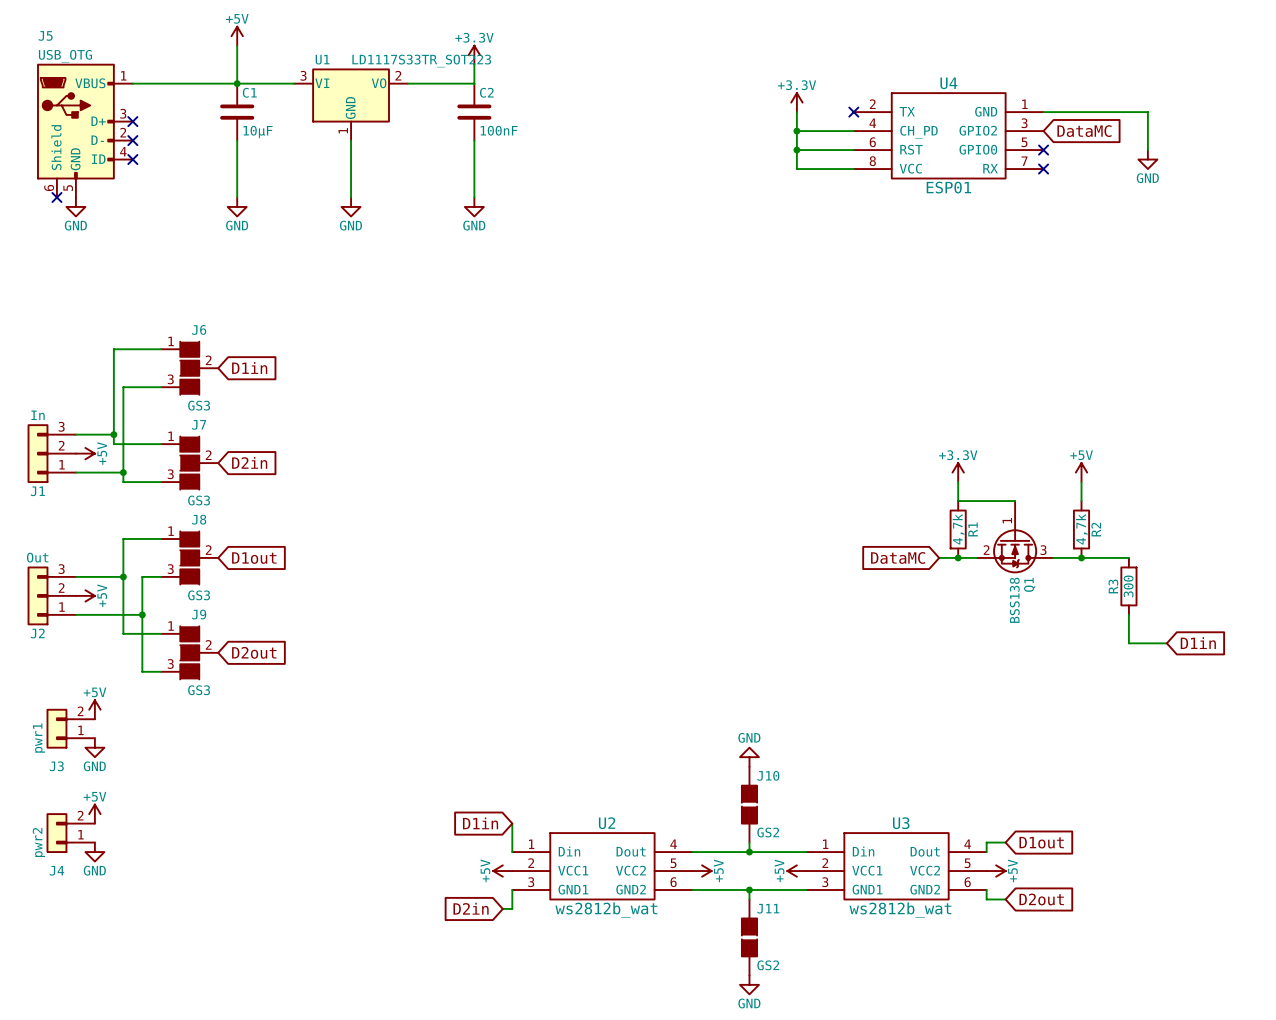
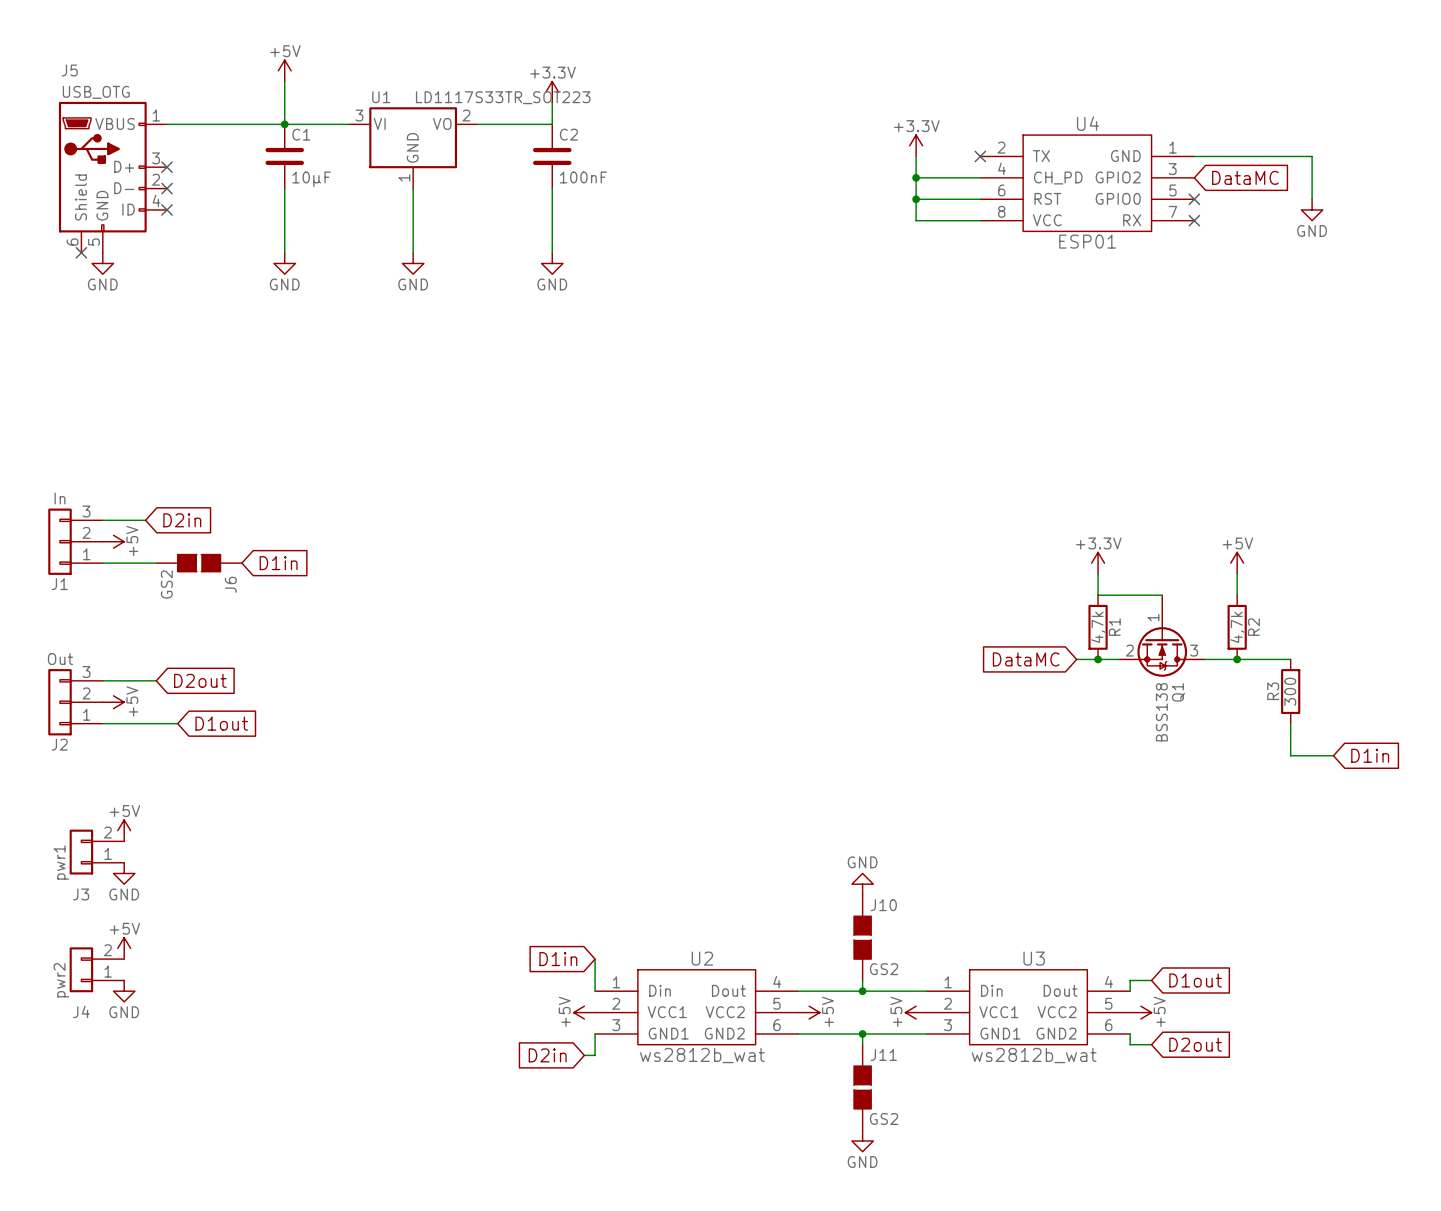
J6 name position: J6 (199, 329) -> J6 (230, 584)
J6 symbol: [161, 341, 219, 395] -> [156, 554, 242, 572]
wire: (161, 349) (113, 349) (113, 444) (161, 444) -> none
global label position: D1in (249, 367) -> D1in (278, 563)
wire: (161, 387) (123, 387) (123, 482) (161, 482) -> none
J6 value: GS3 (199, 405) -> GS2 (166, 584)
junction: (113, 434) -> none
global label position: D2in (249, 462) -> D2in (182, 520)
J7: GS3 (189, 463) -> none
junction: (123, 472) -> none
wire: (161, 538) (123, 538) (123, 633) (161, 633) -> none
J8: GS3 (189, 557) -> none
global label position: D1out (254, 558) -> D1out (221, 723)
junction: (123, 576) -> none
wire: (161, 576) (142, 576) (142, 671) (161, 671) -> none
junction: (142, 614) -> none
J9: GS3 (189, 652) -> none
global label position: D2out (254, 652) -> D2out (200, 680)

